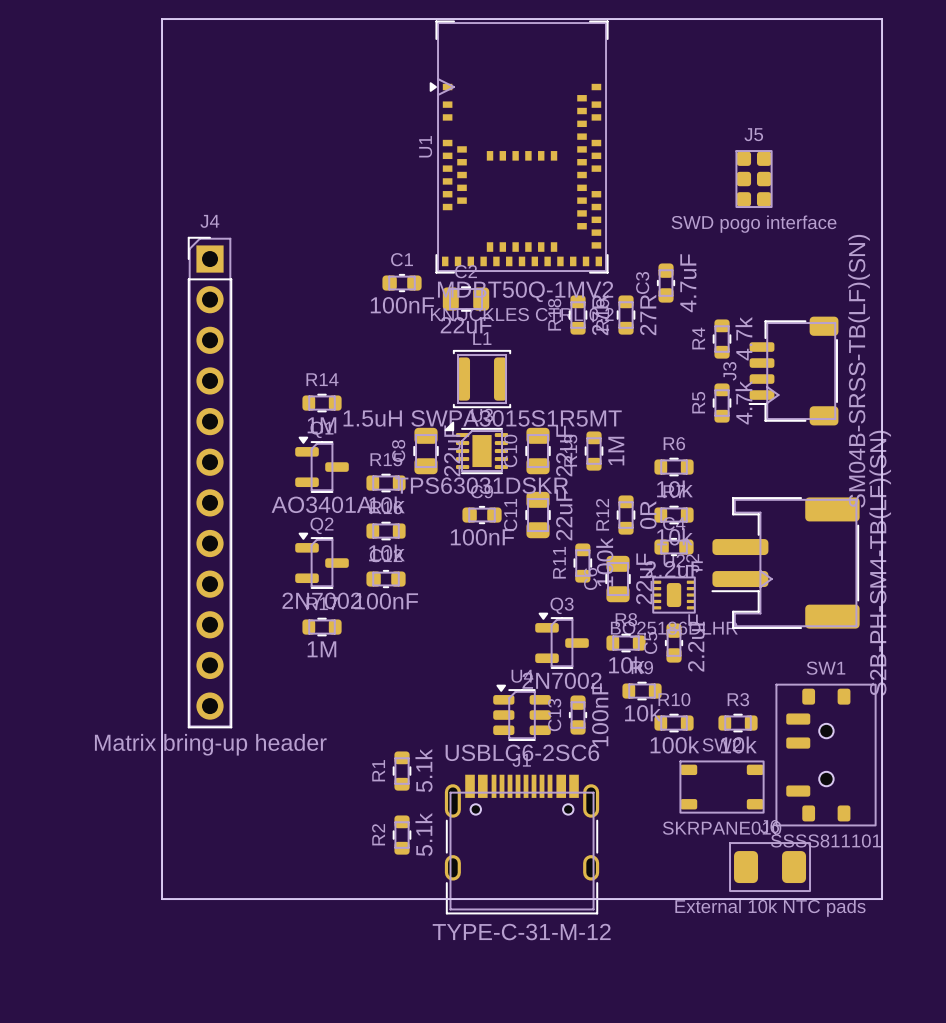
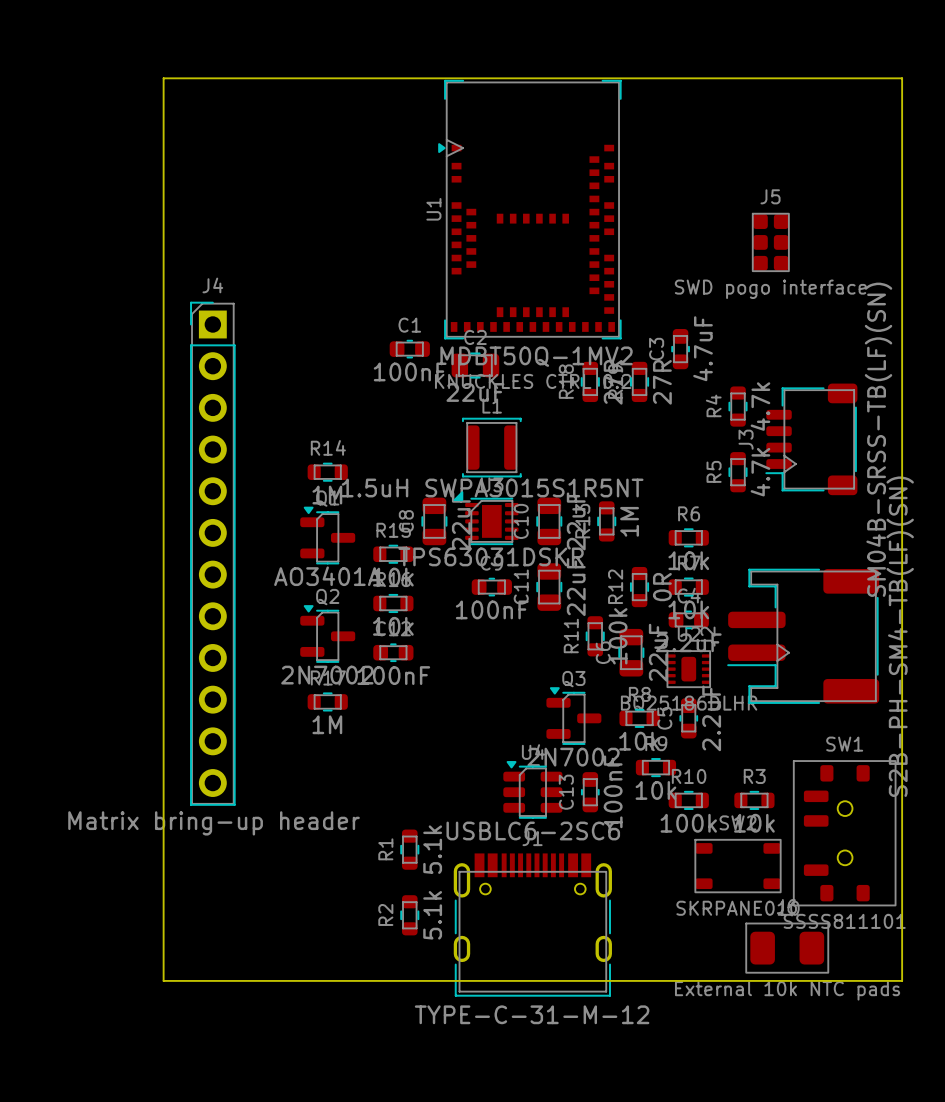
L1 value: 1.5uH SWPA3015S1R5MT (482, 418) -> 1.5uH SWPA3015S1R5NT (492, 487)

